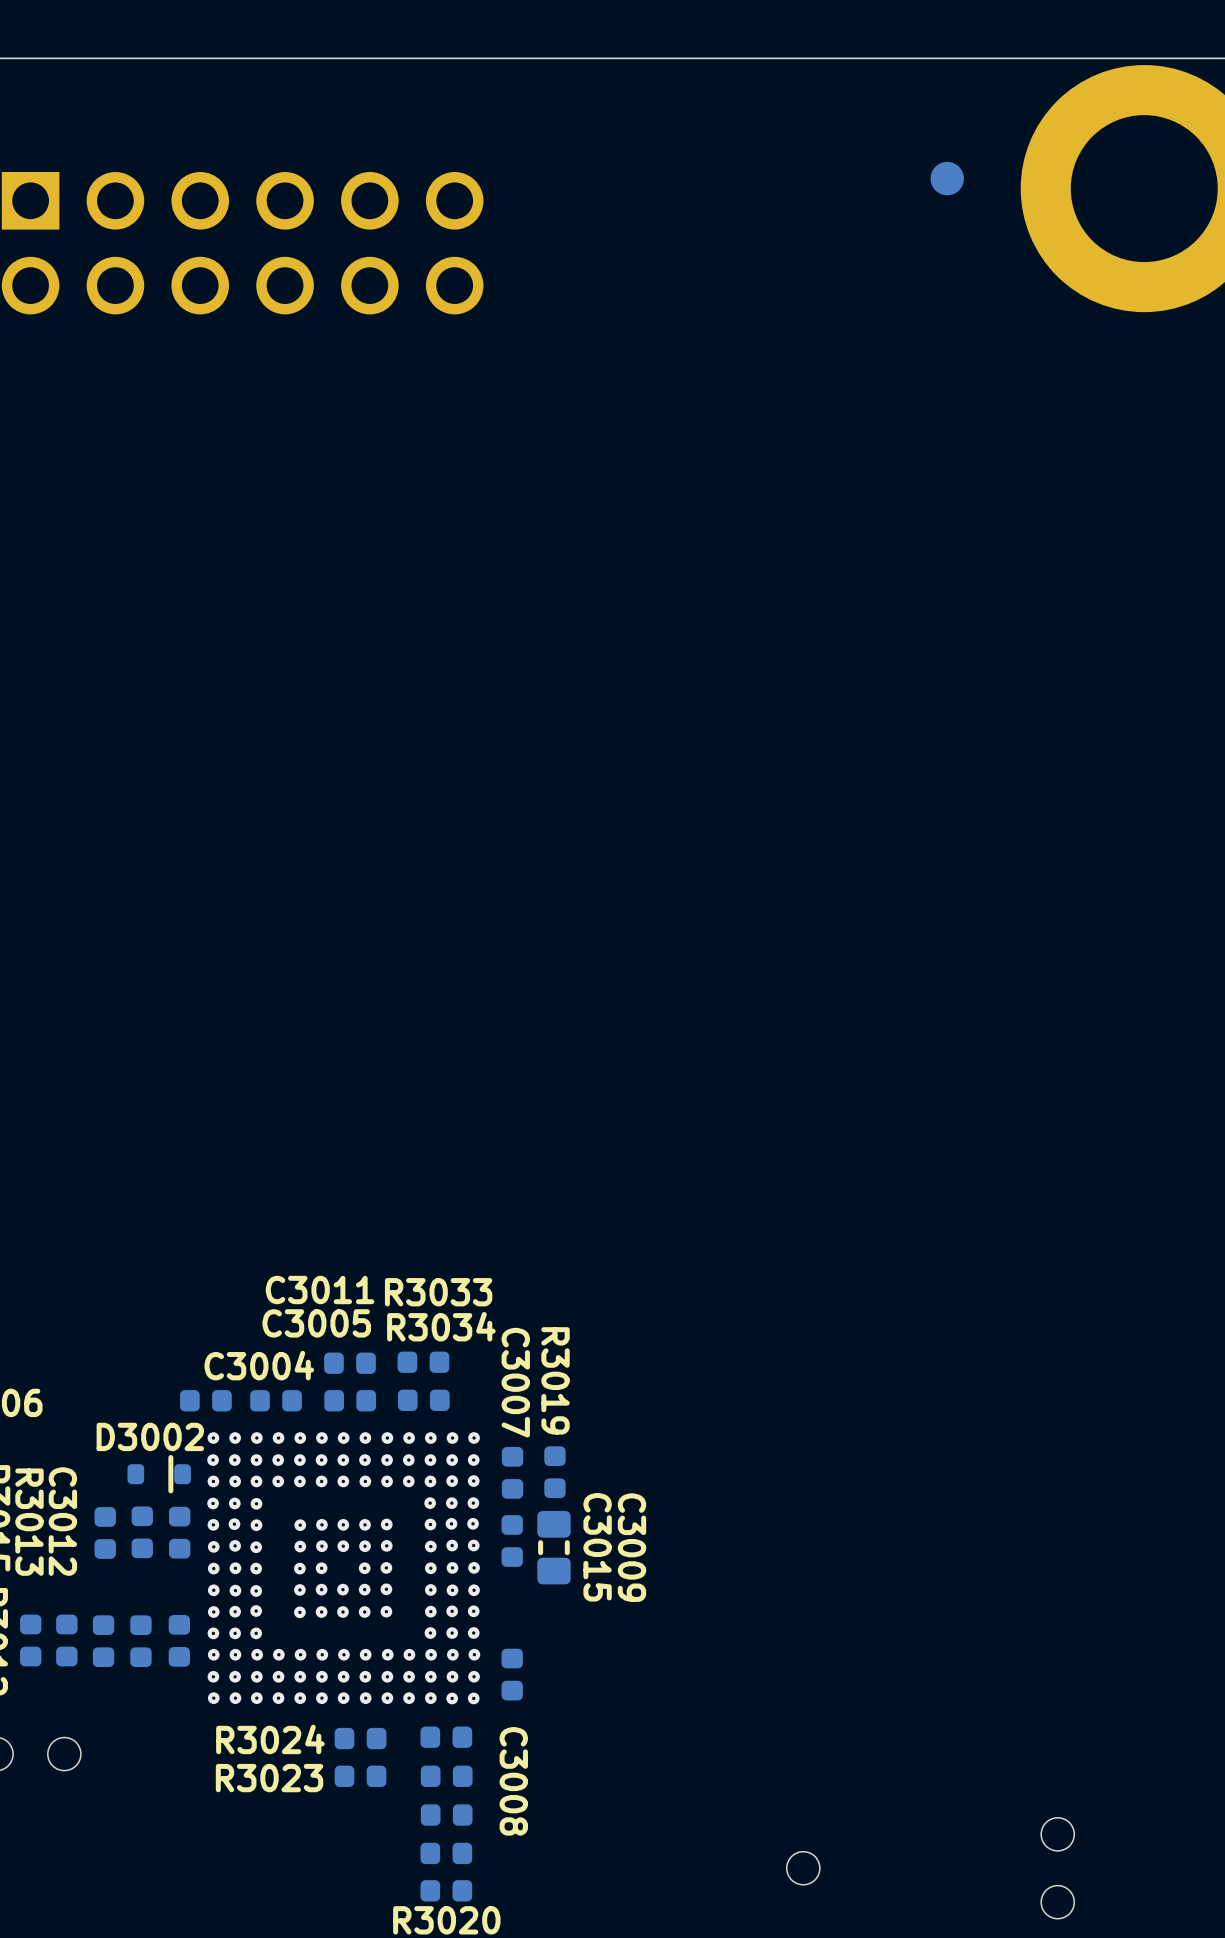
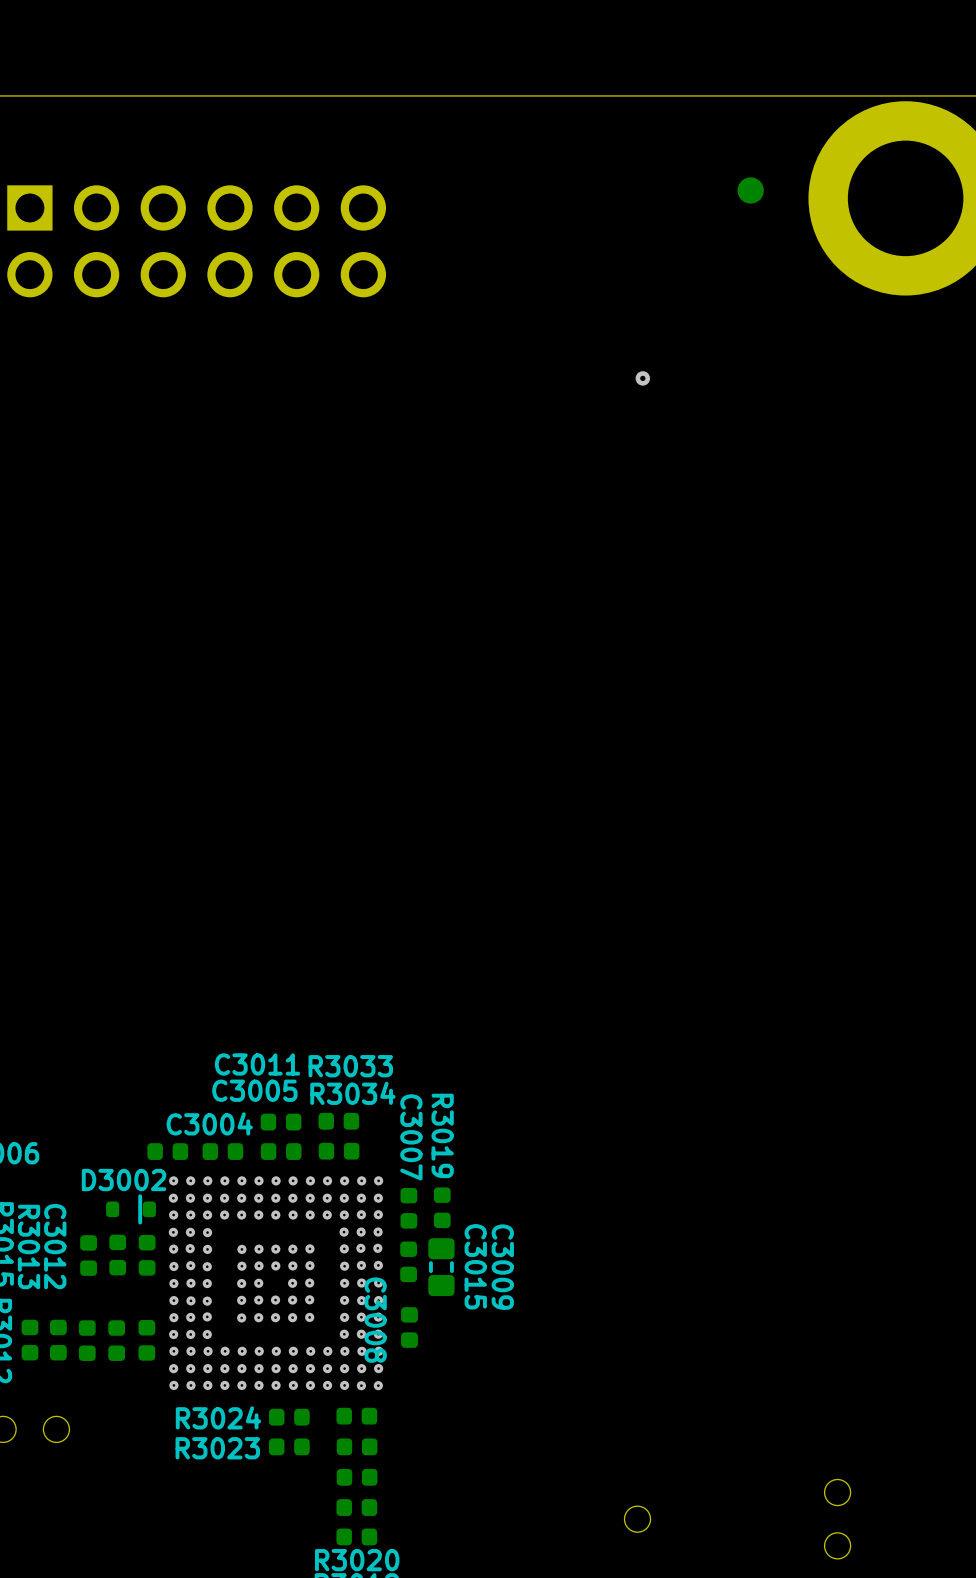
via: none -> (642, 378)
C3008 position: (512, 1674) -> (409, 1327)
C3008 name position: C3008 (513, 1781) -> C3008 (375, 1320)

